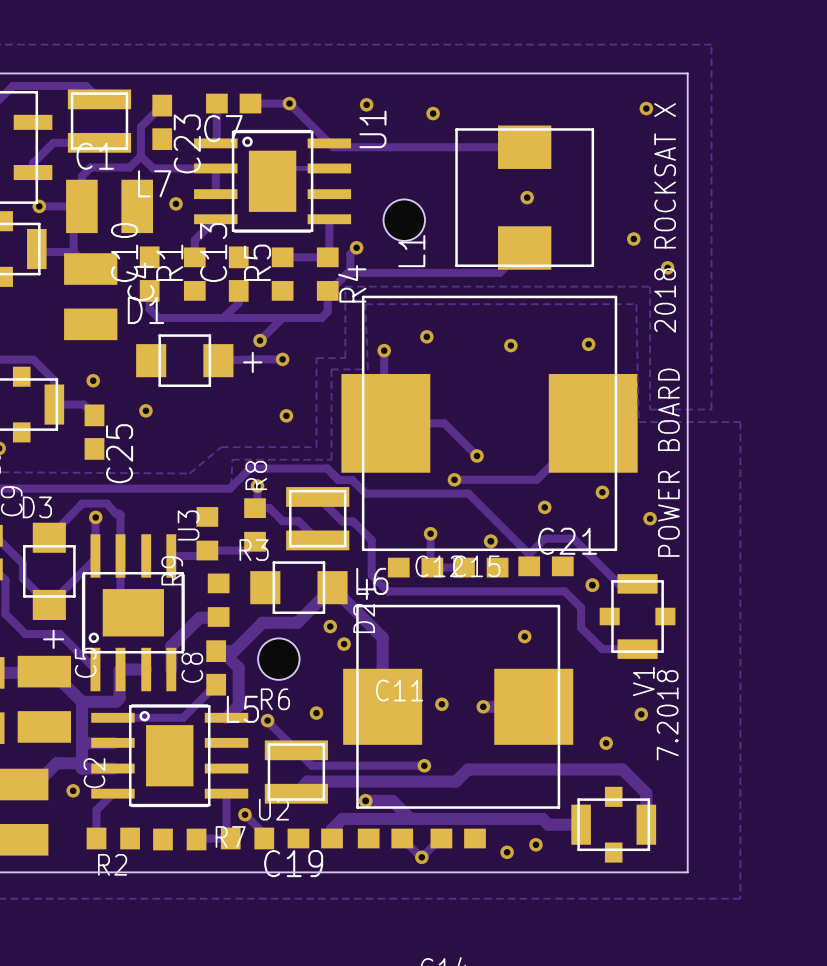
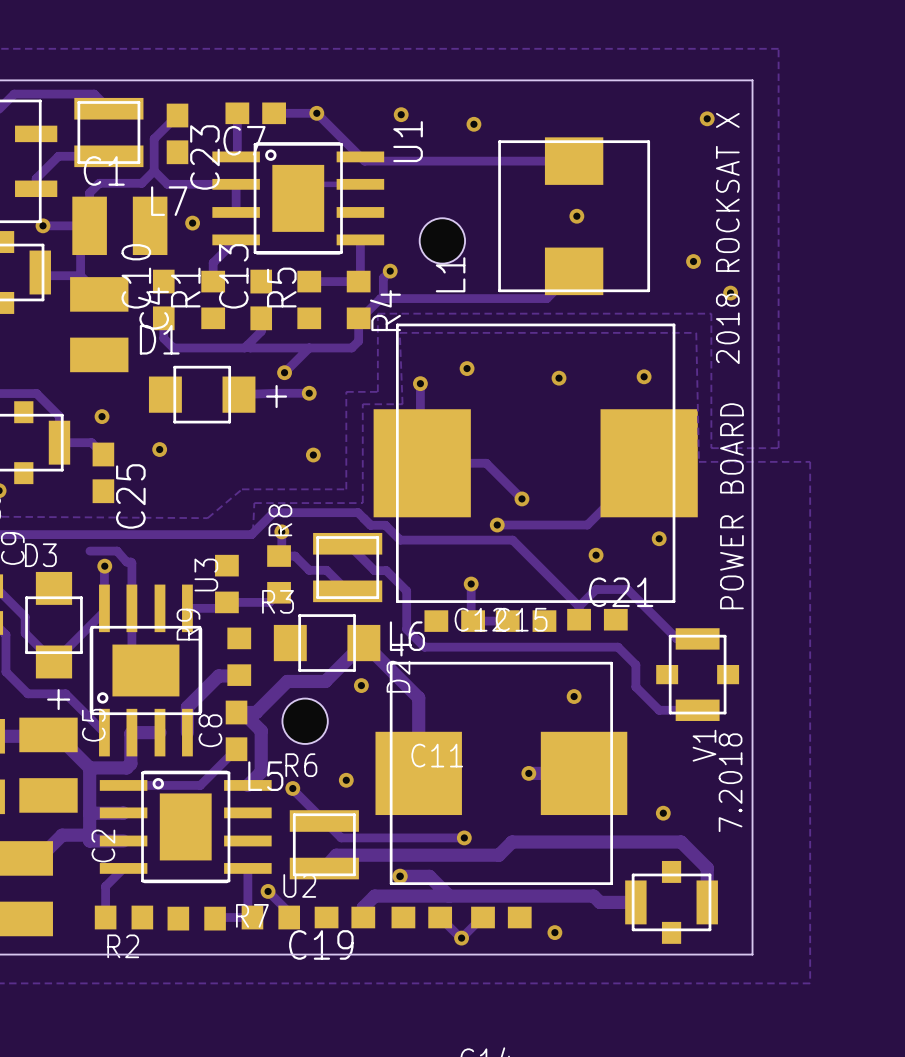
track: (82, 503) (49, 537) -> none
via: (650, 518) -> none
via: (490, 541) -> none
via: (592, 585) -> none
via: (344, 644) -> none
via: (441, 704) -> none
via: (641, 714) -> none
via: (73, 790) -> none
via: (535, 844) -> none

